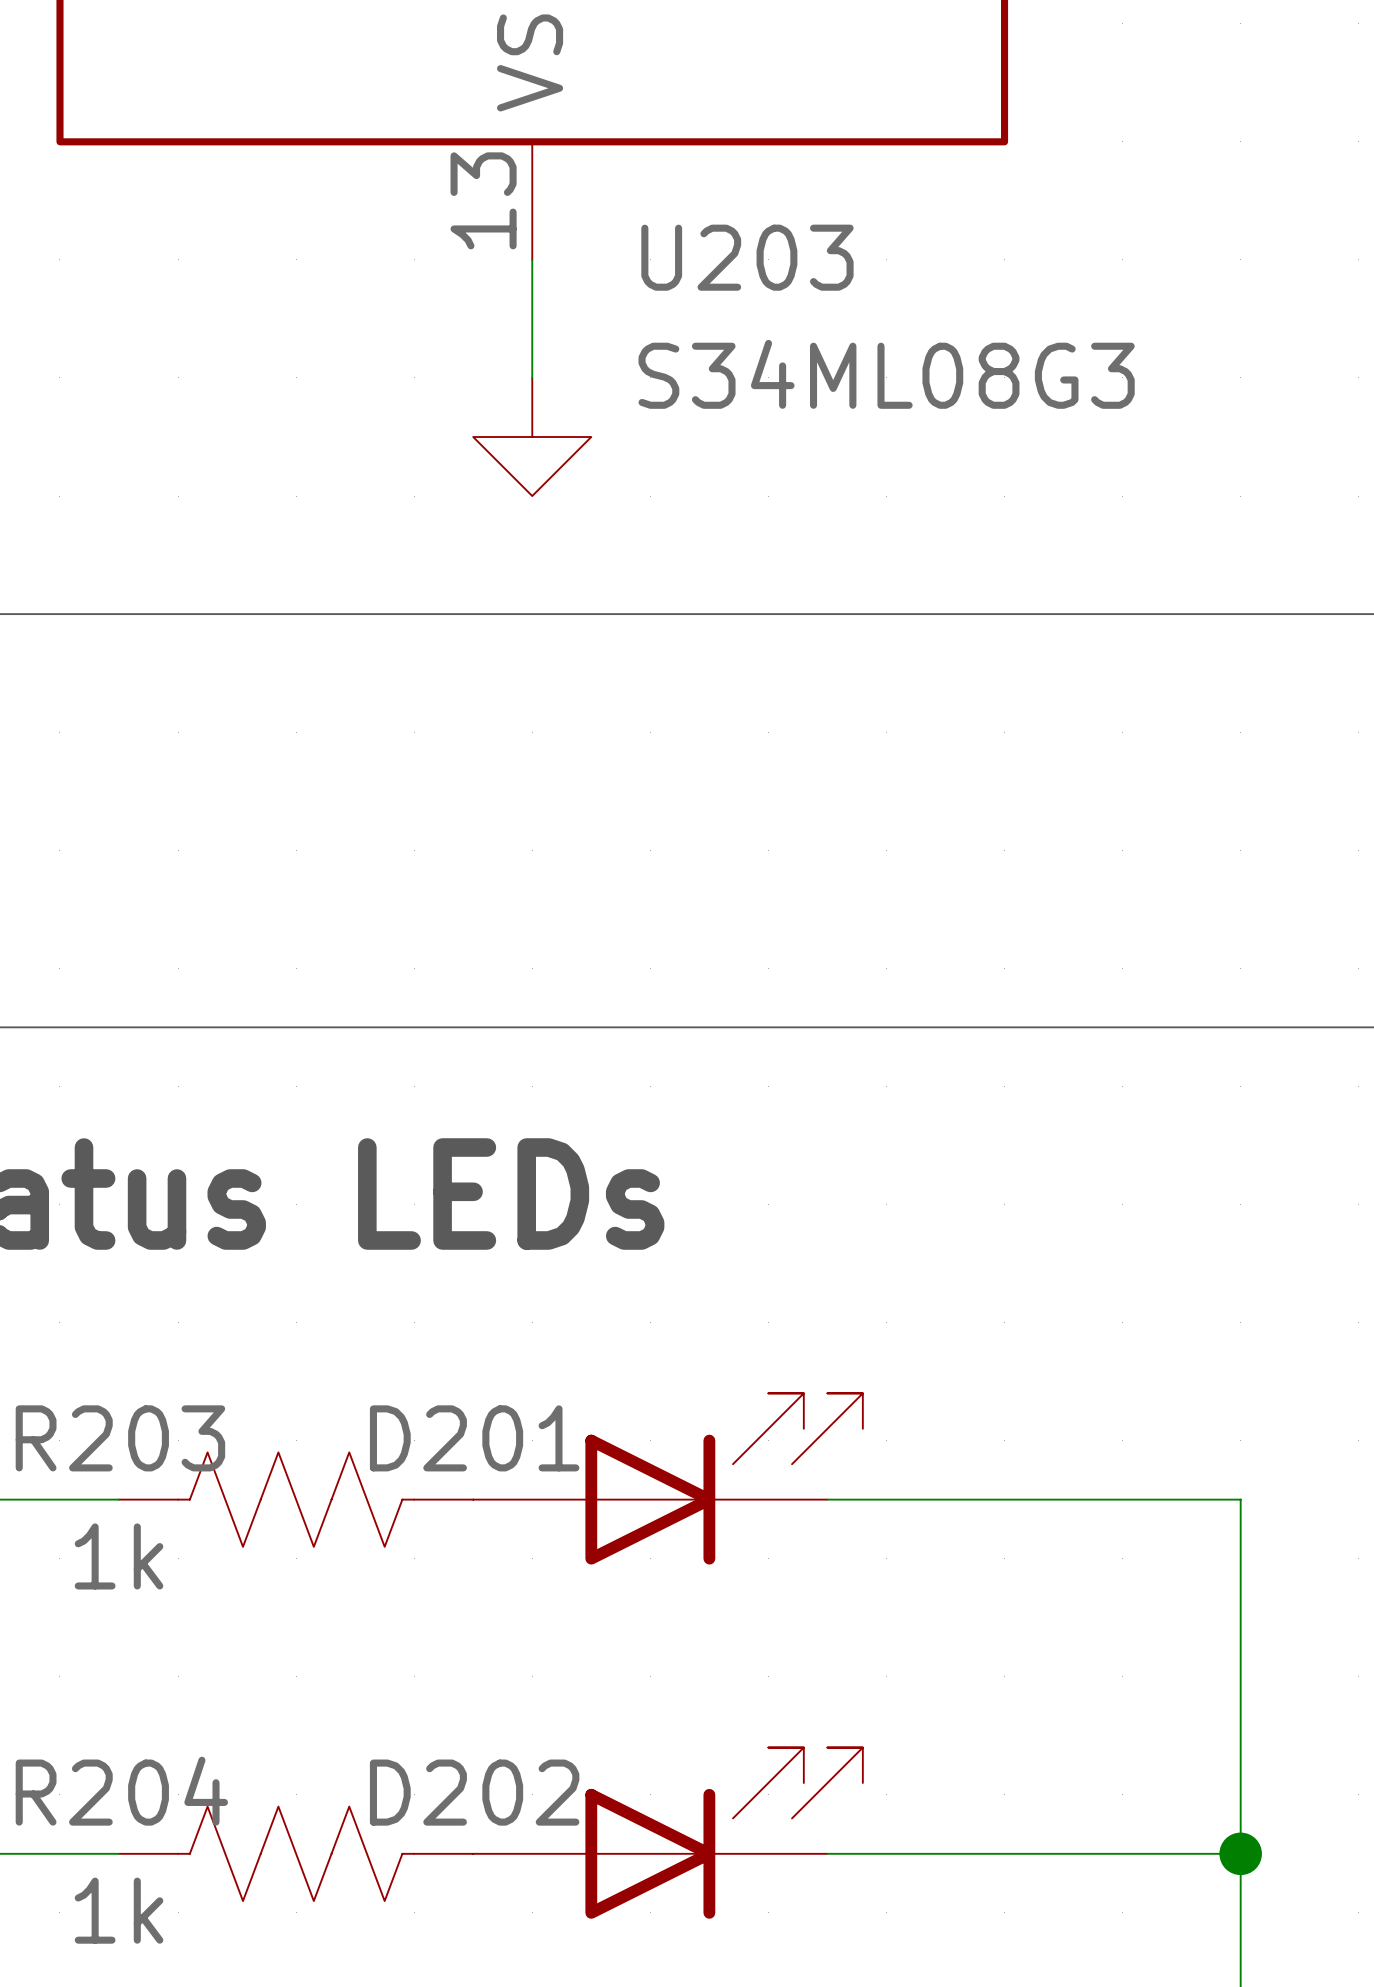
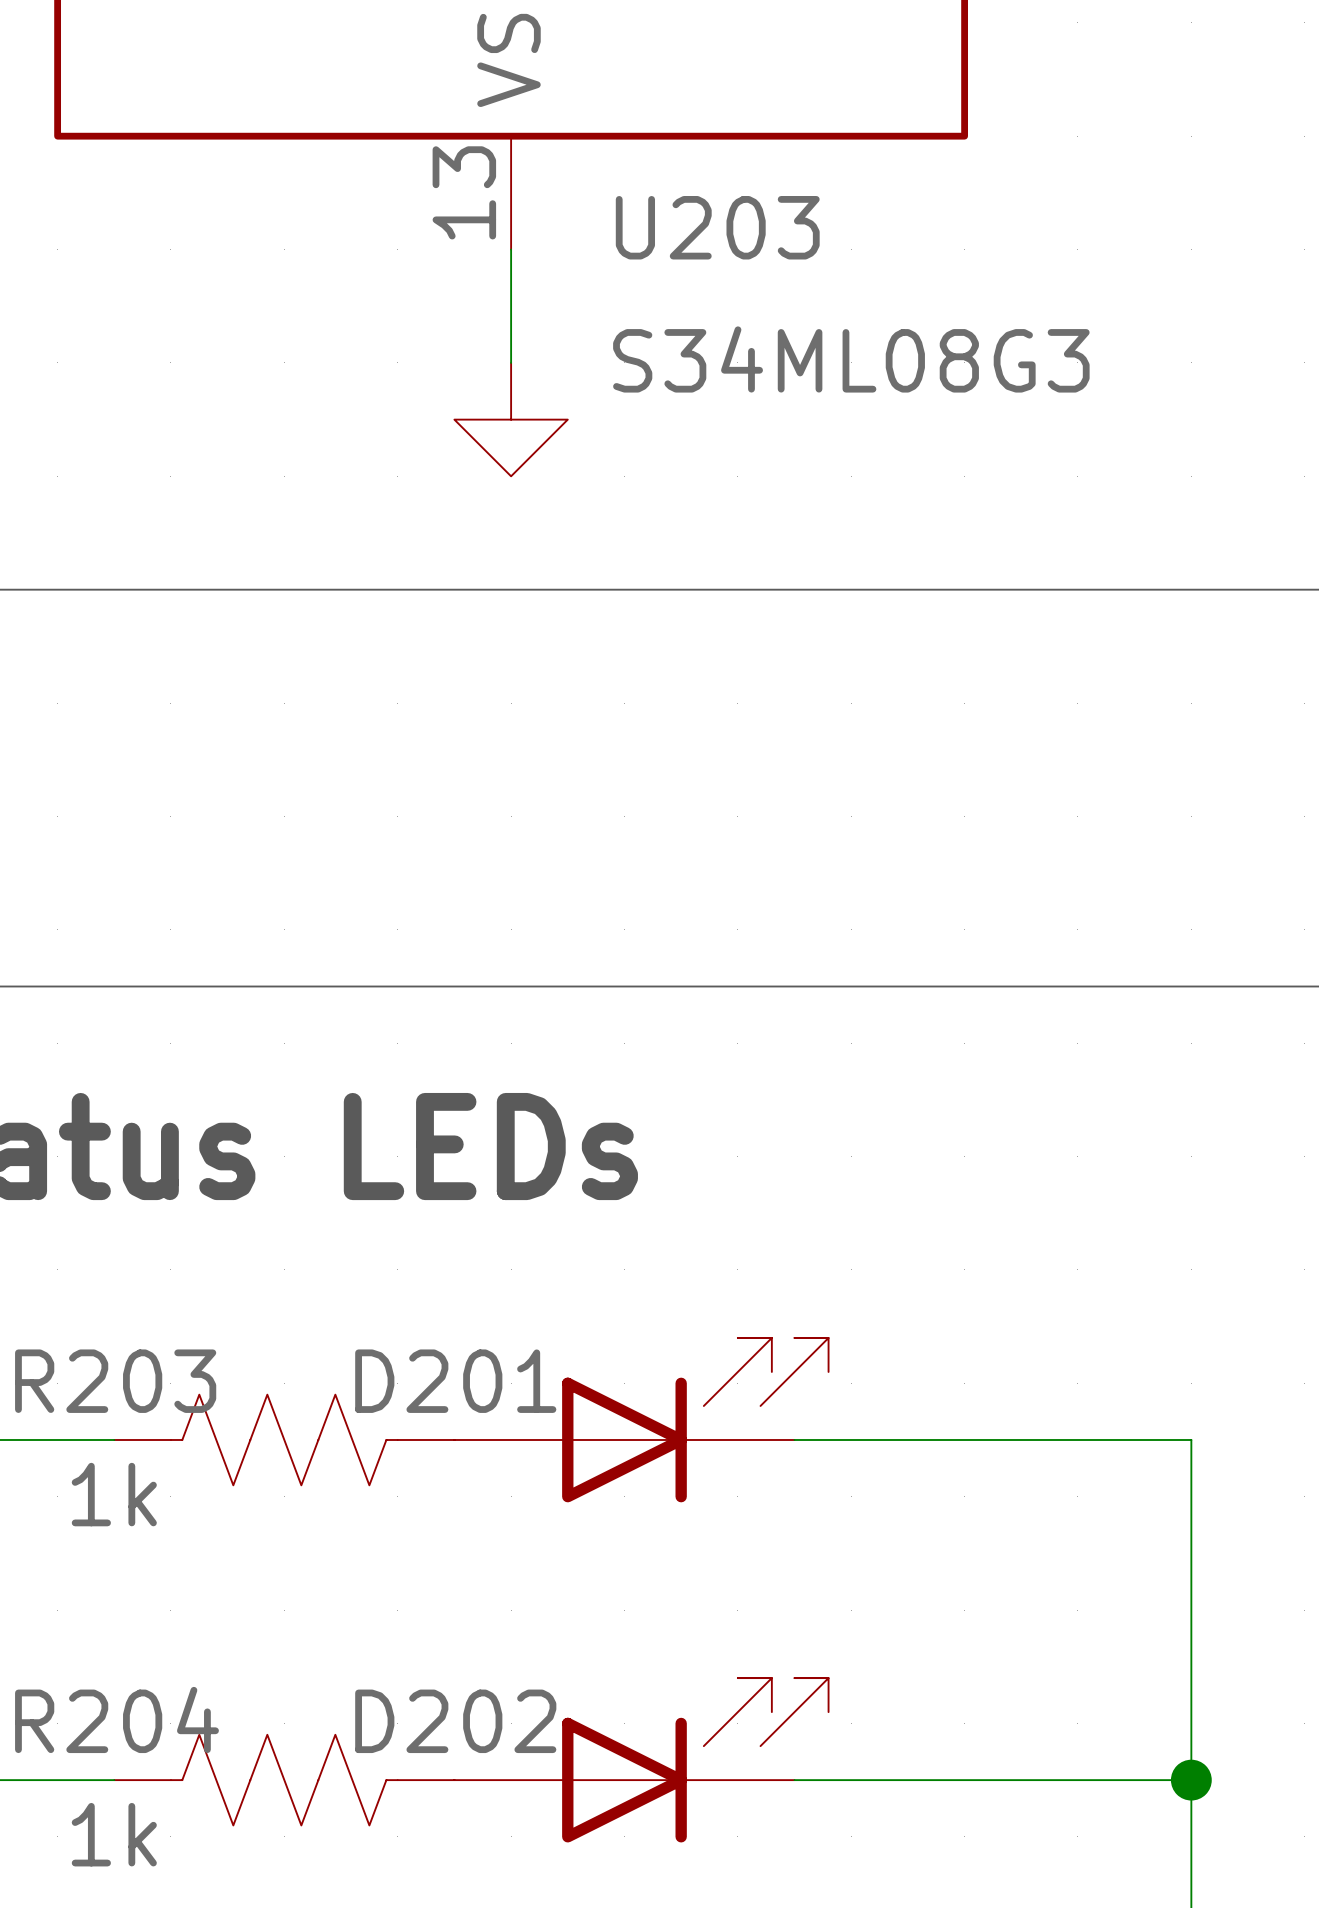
U203 name position: U203 (747, 257) -> U203 (717, 227)

